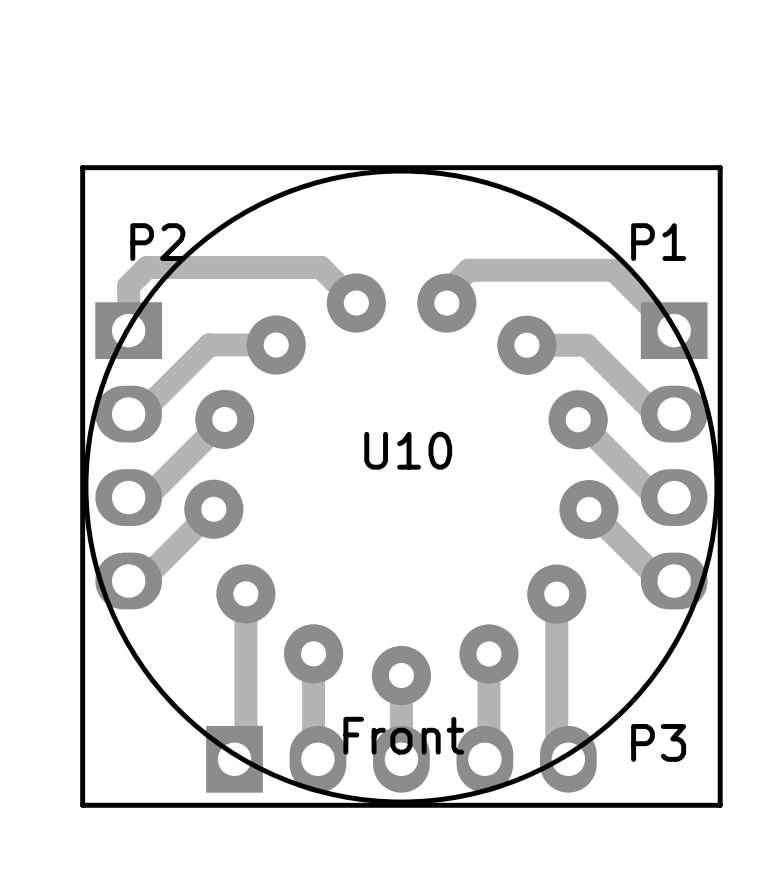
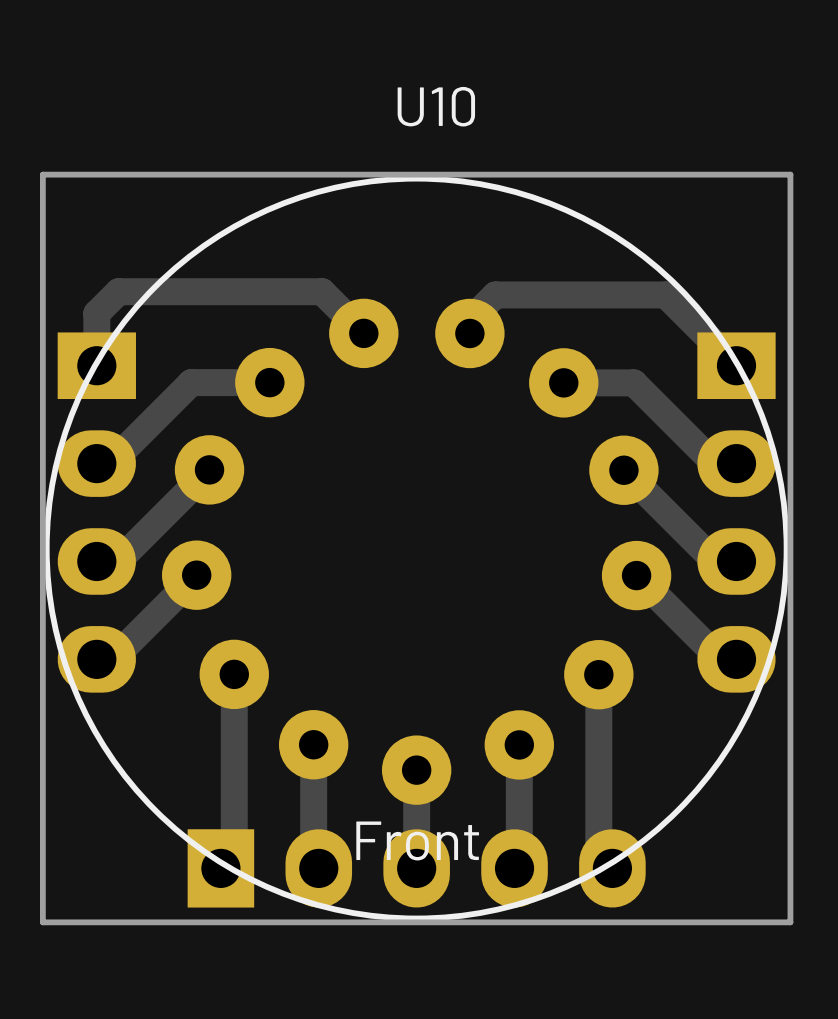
P2 name: P2 (157, 242) -> none
P1 name: P1 (658, 242) -> none
U10 name position: U10 (408, 450) -> U10 (436, 106)
P3 name: P3 (658, 742) -> none

